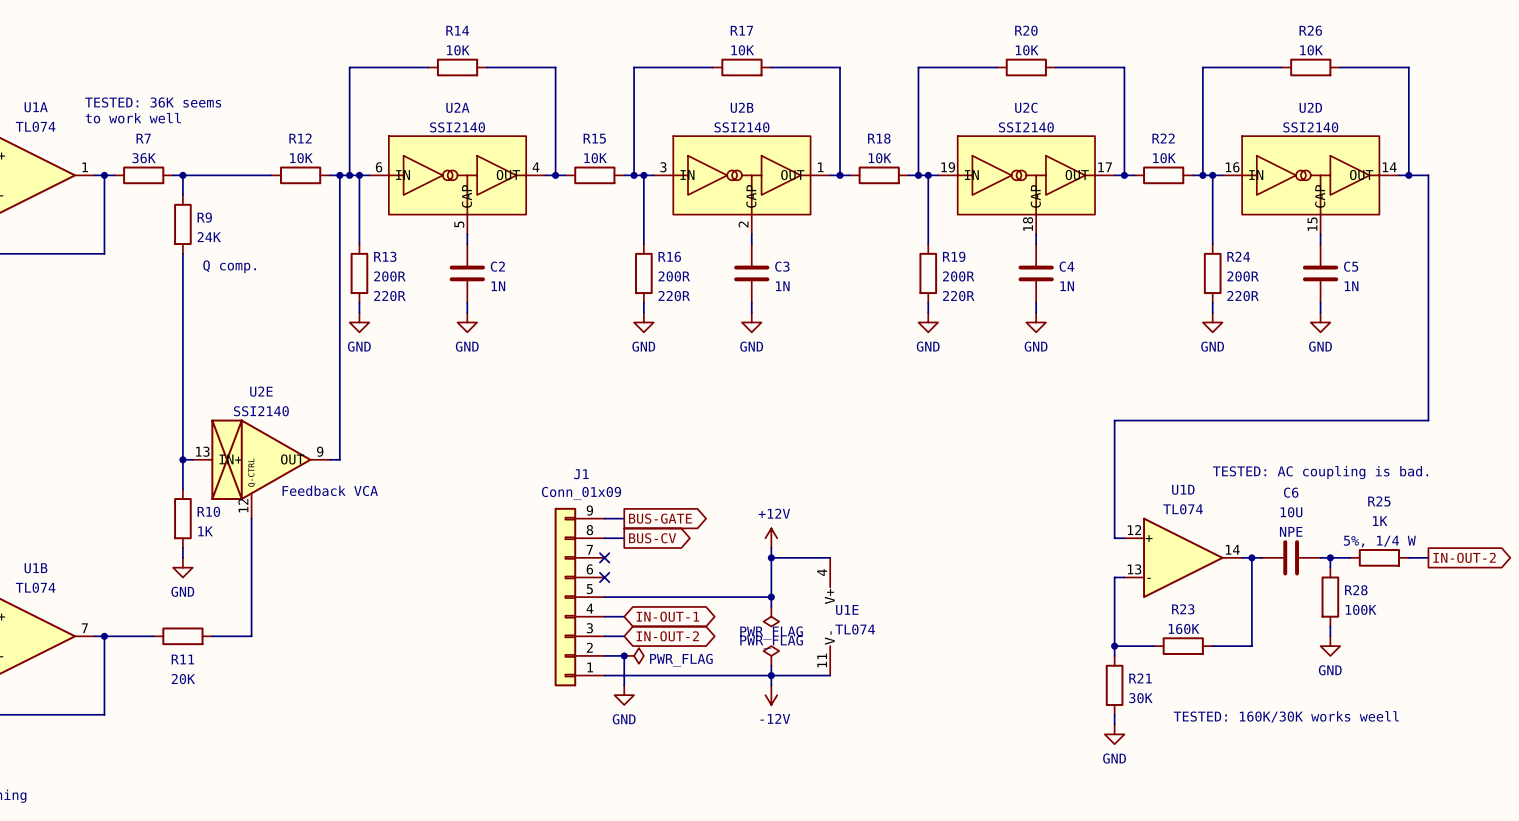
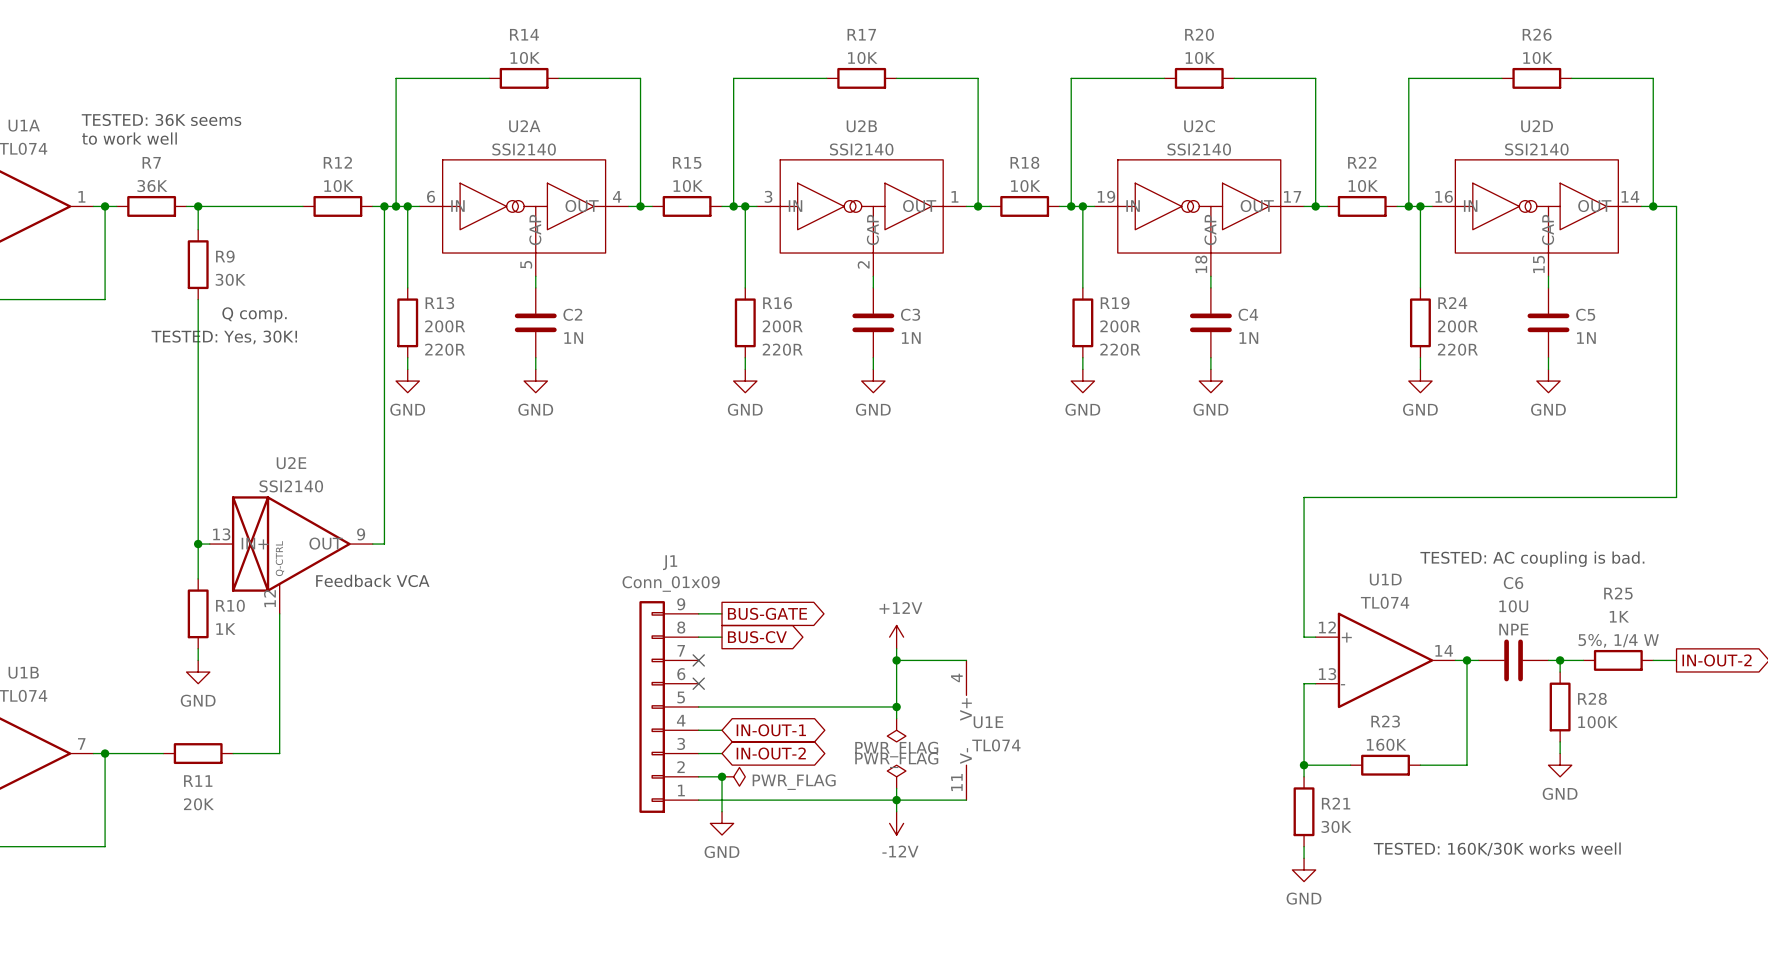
R9 value: 24K (209, 237) -> 30K (230, 279)
text: none -> TESTED: Yes, 30K! (224, 337)

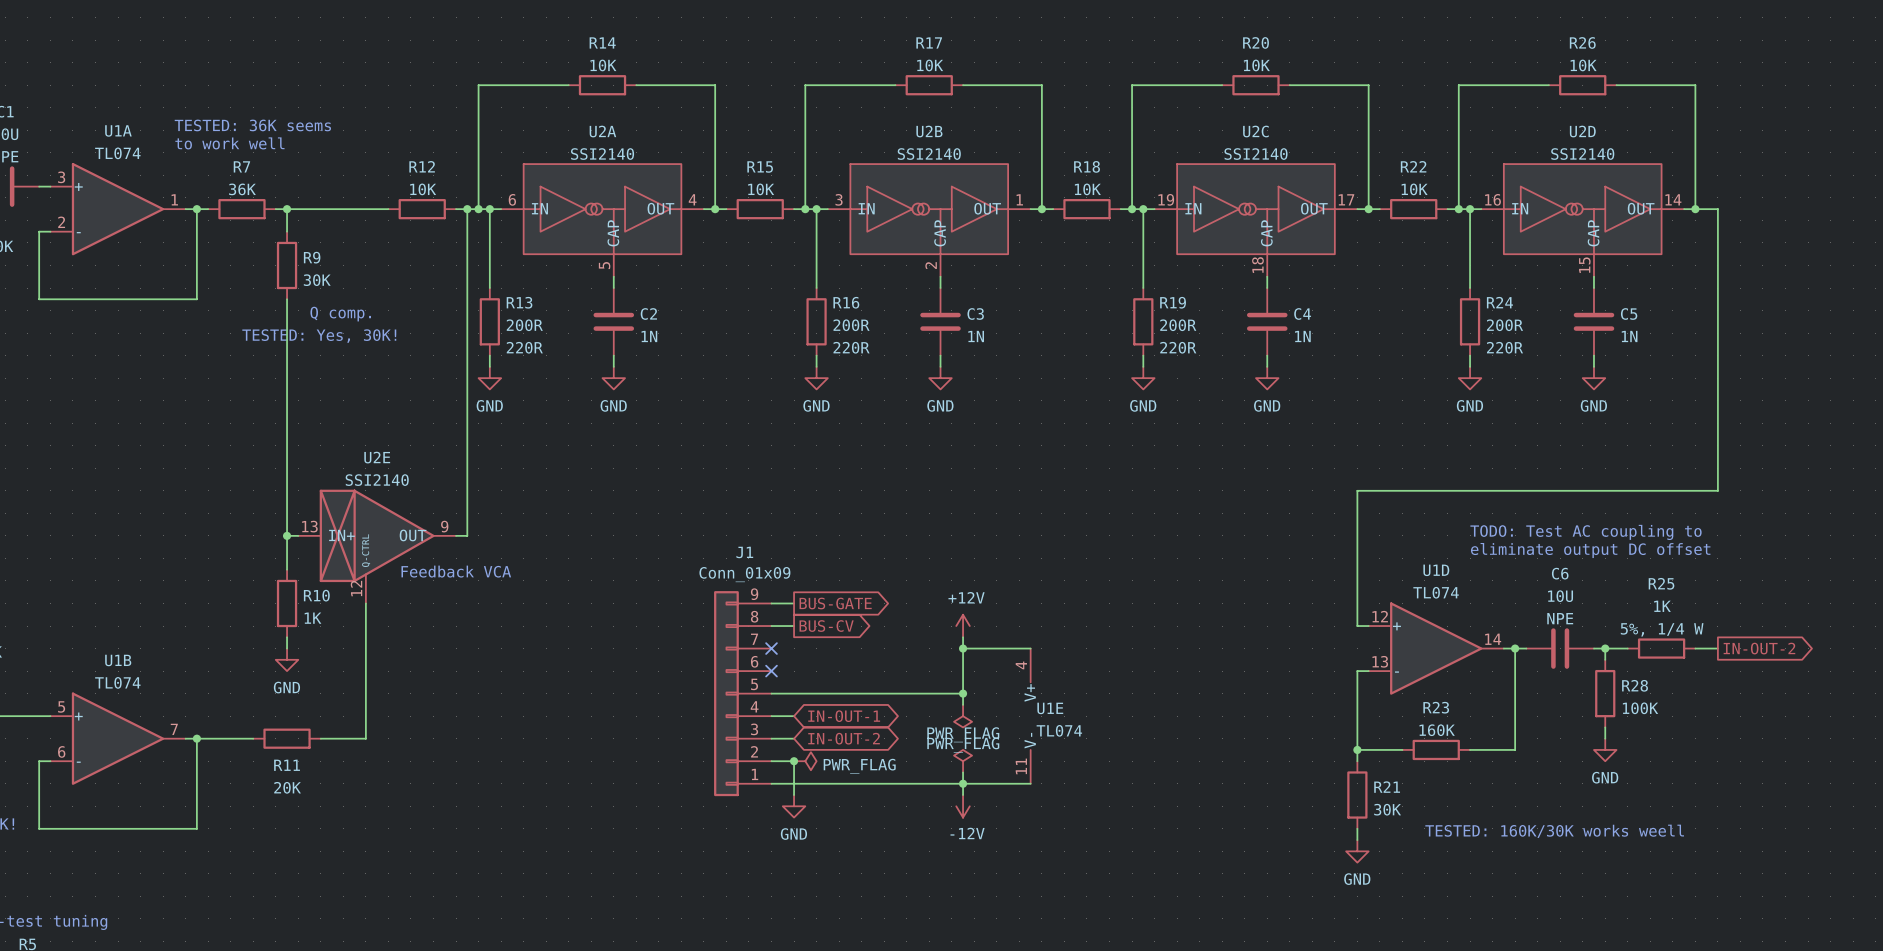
text: none -> TODO: Test AC coupling to (1586, 532)
text: TESTED: AC coupling is bad. (1532, 559) -> eliminate output DC offset (1590, 550)

